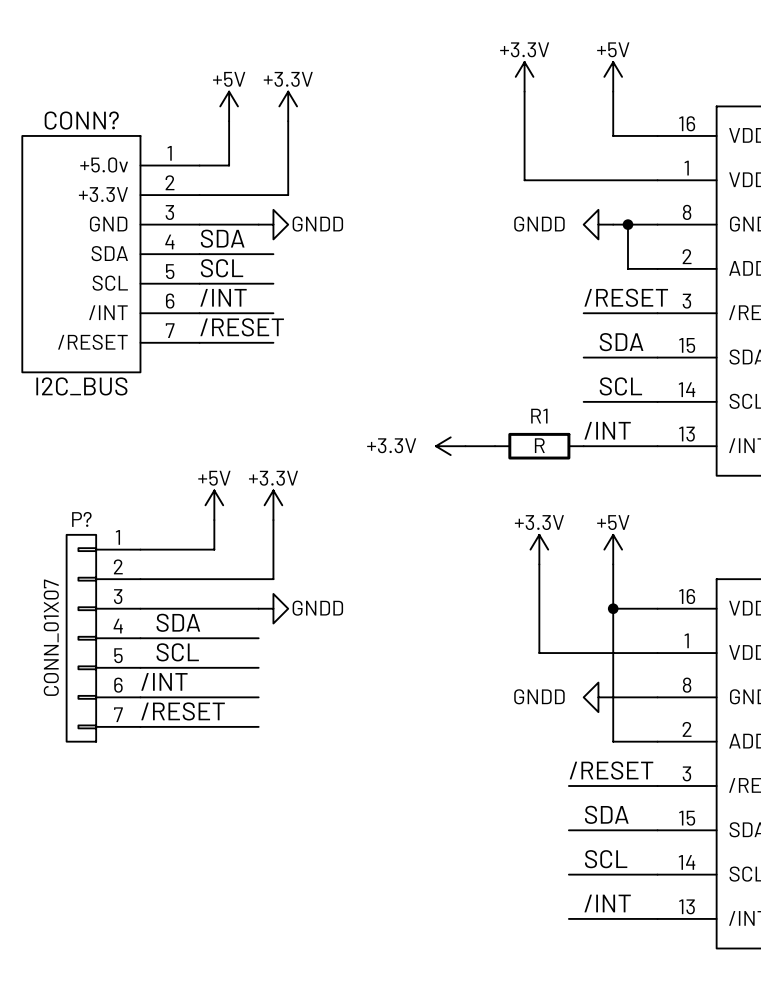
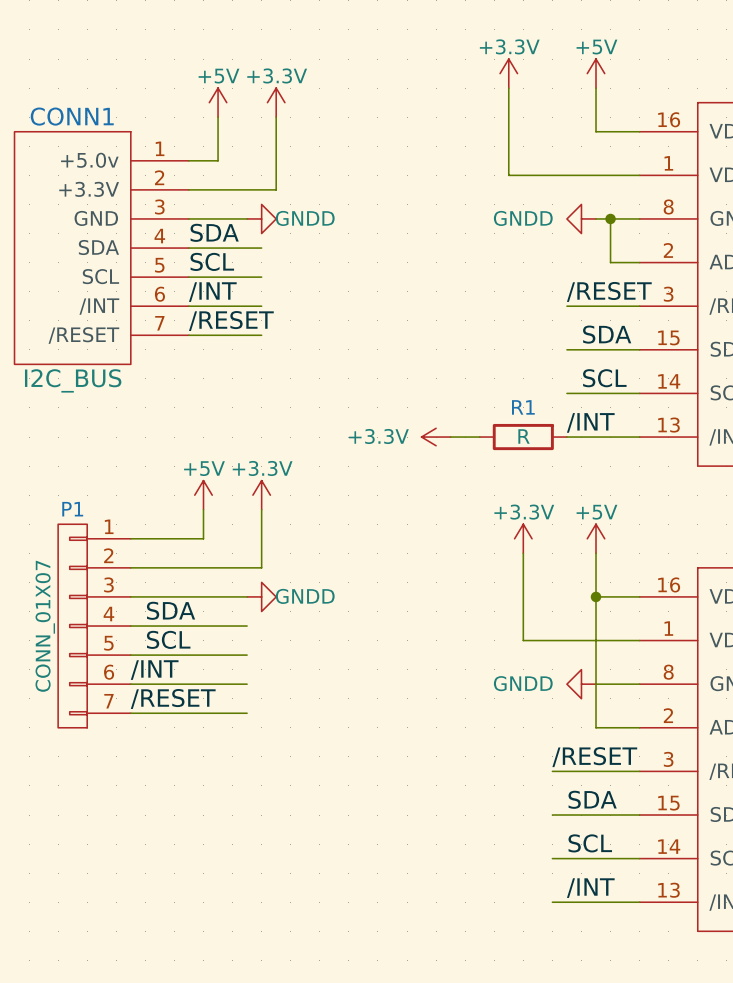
CONN? name: CONN? (81, 120) -> CONN1 (72, 116)
P? name: P? (81, 519) -> P1 (72, 509)

